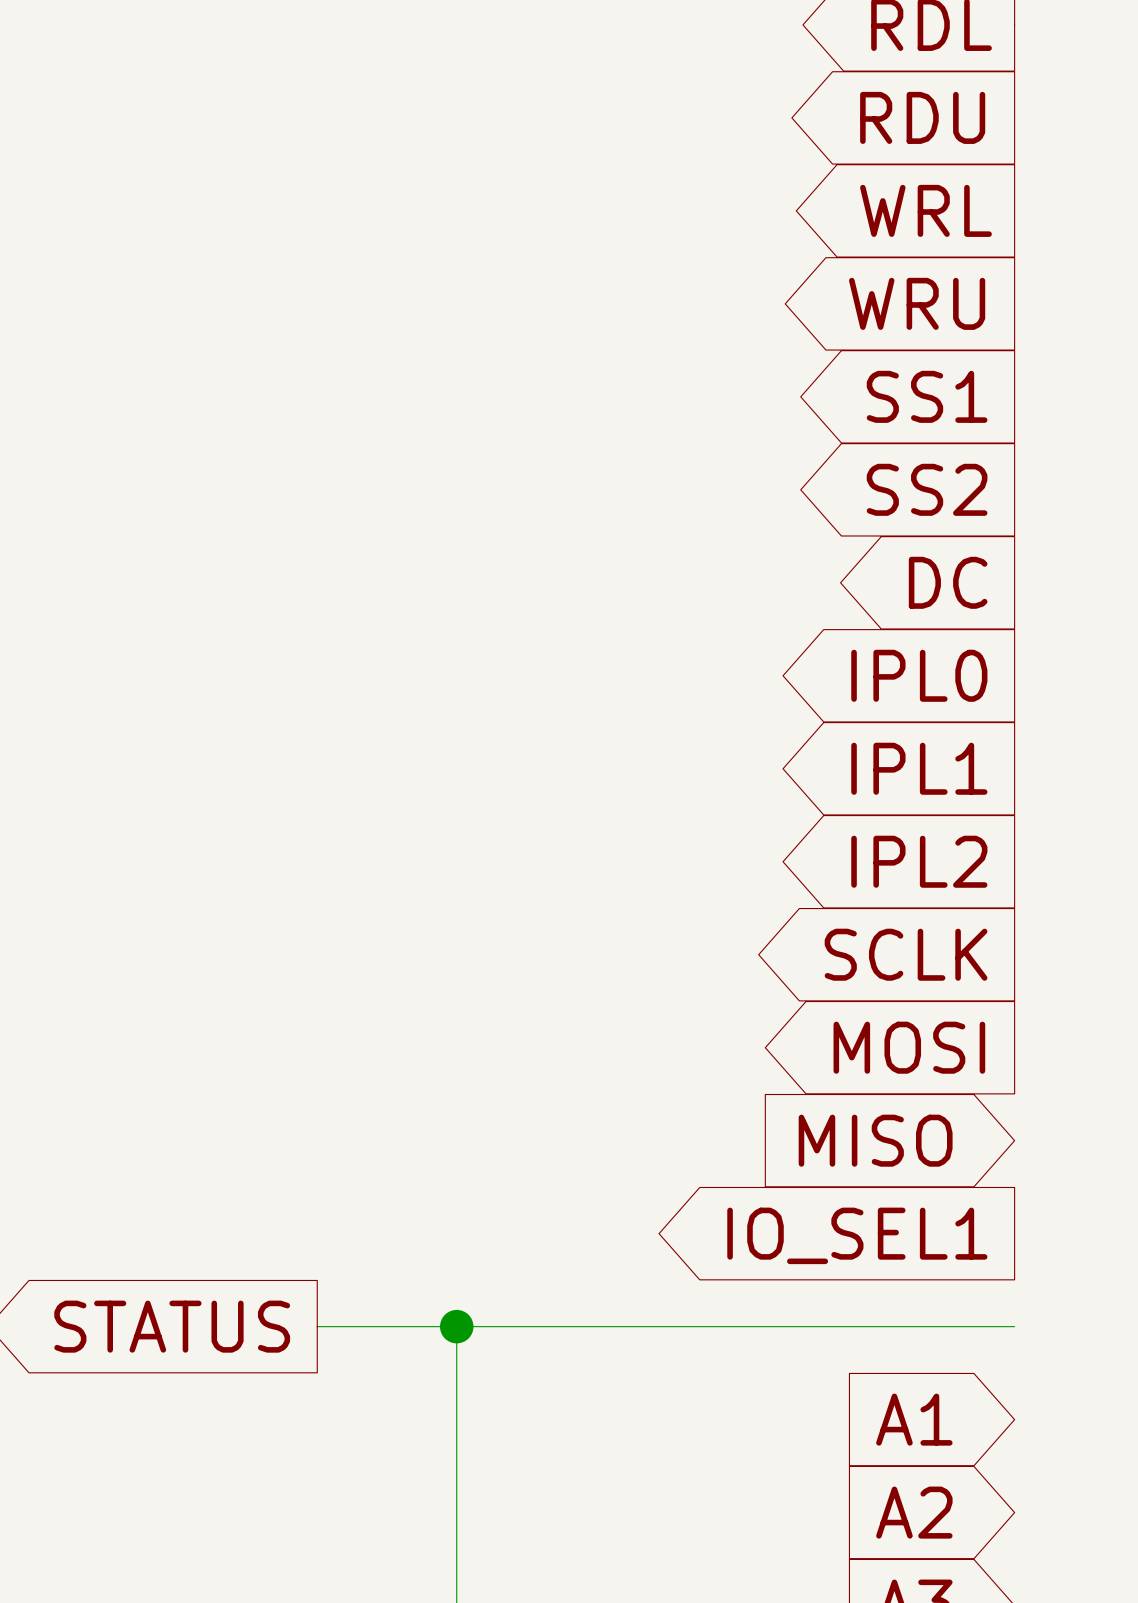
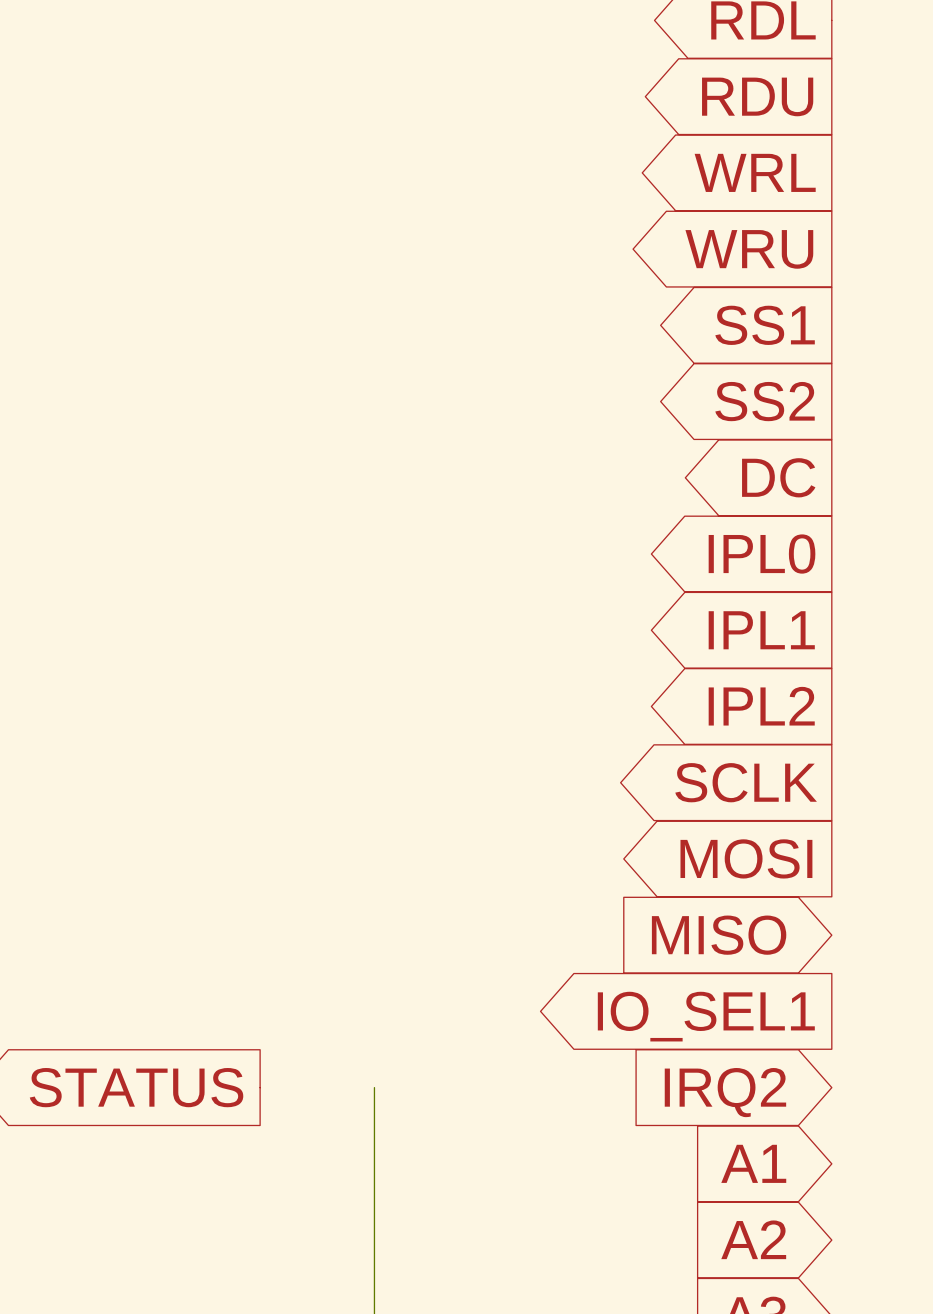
wire: (317, 1326) (1014, 1326) -> none
junction: (456, 1326) -> none
global label: none -> IRQ2 (725, 1092)

